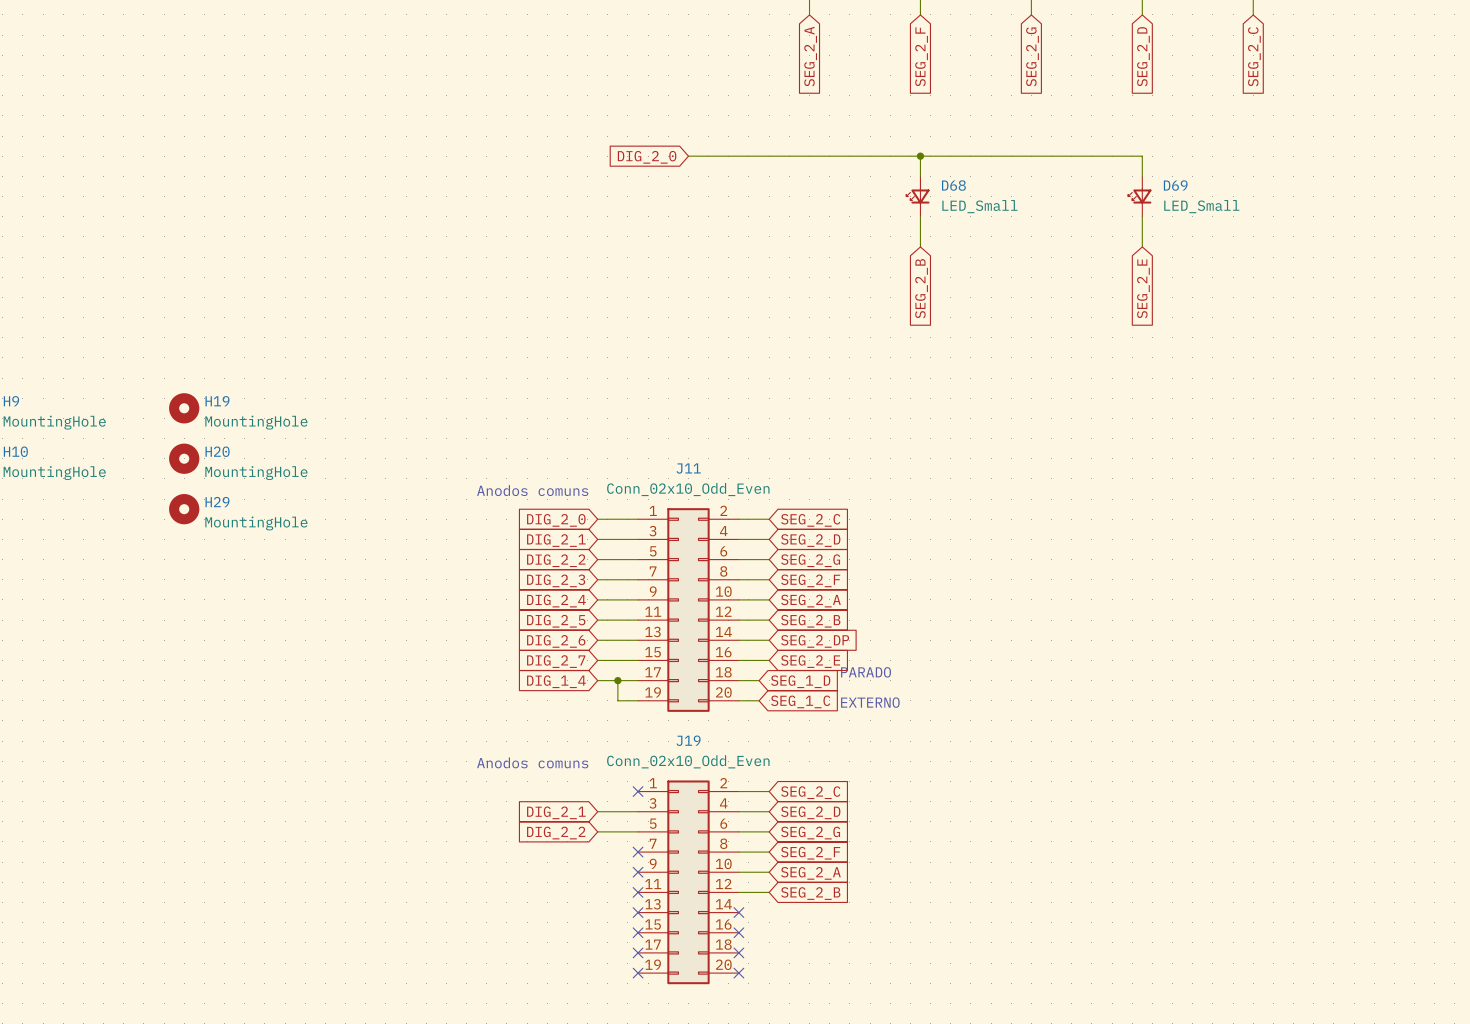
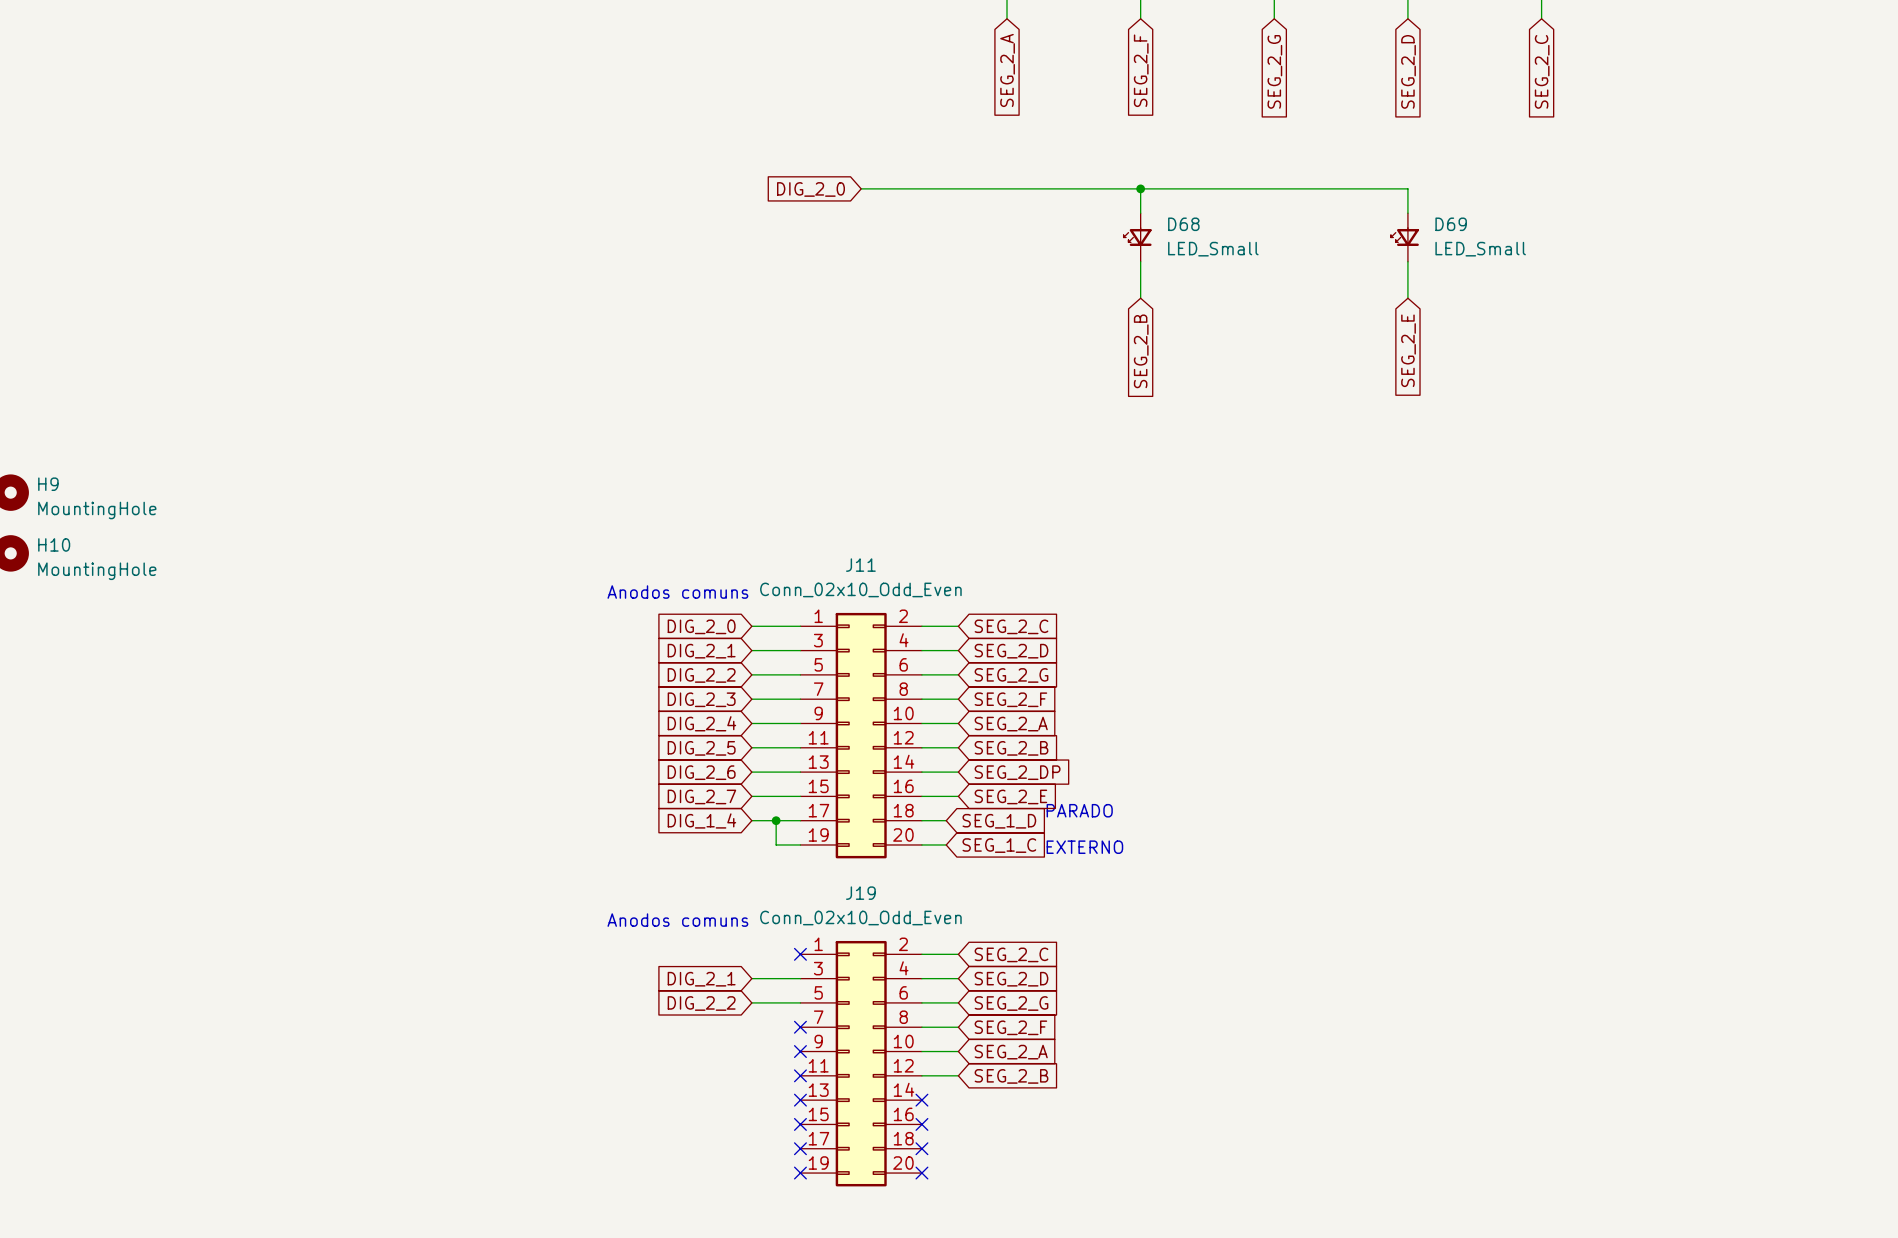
H19: MountingHole (184, 408) -> none
H20: MountingHole (184, 458) -> none
H29: MountingHole (184, 509) -> none

